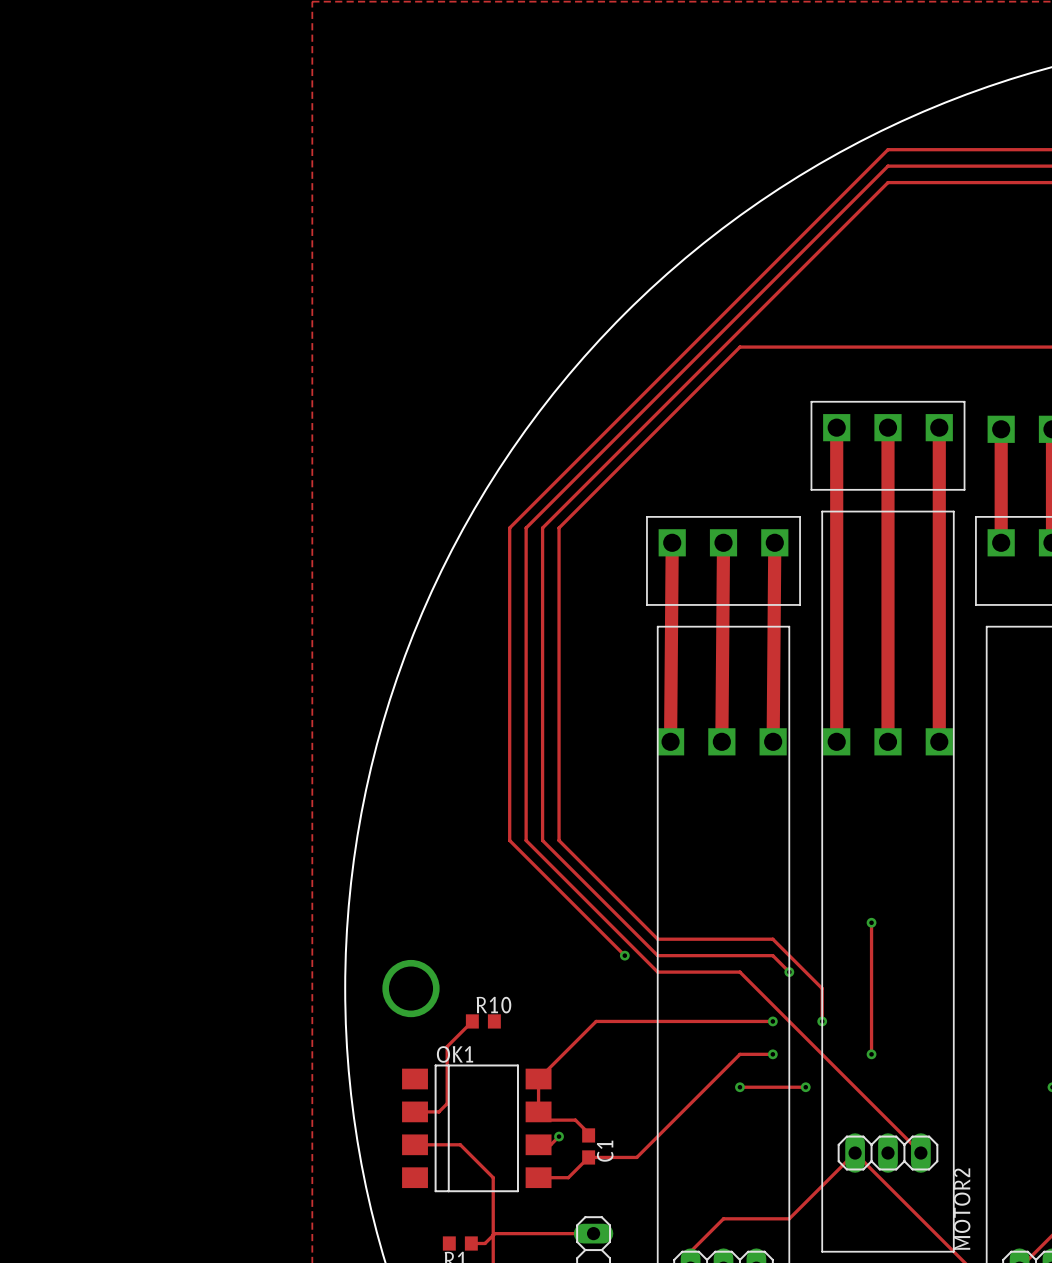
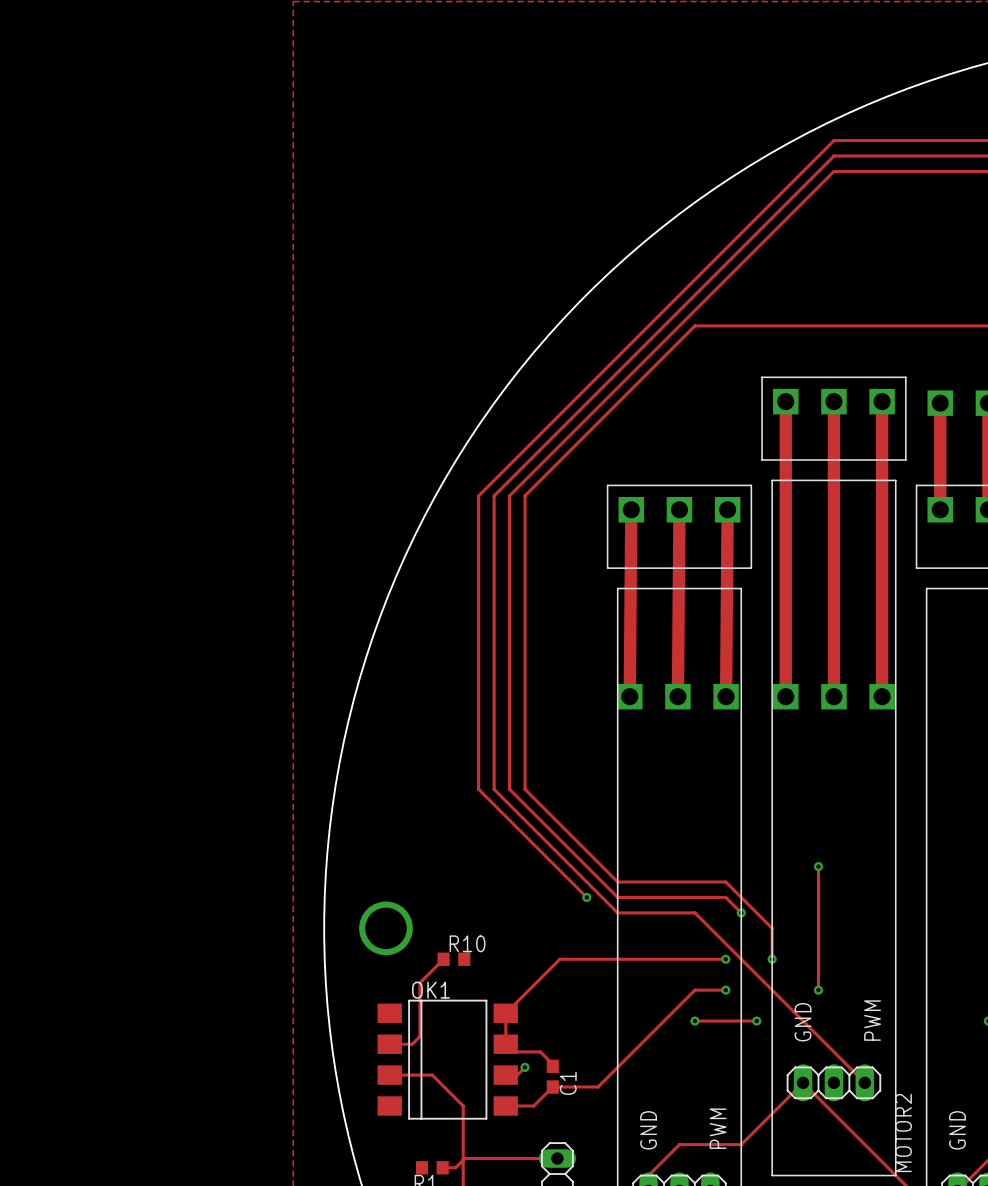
text: none -> PWM (872, 1020)
text: none -> GND (803, 1022)
text: none -> PWM (718, 1128)
text: none -> GND (648, 1130)
text: none -> GND (957, 1130)

